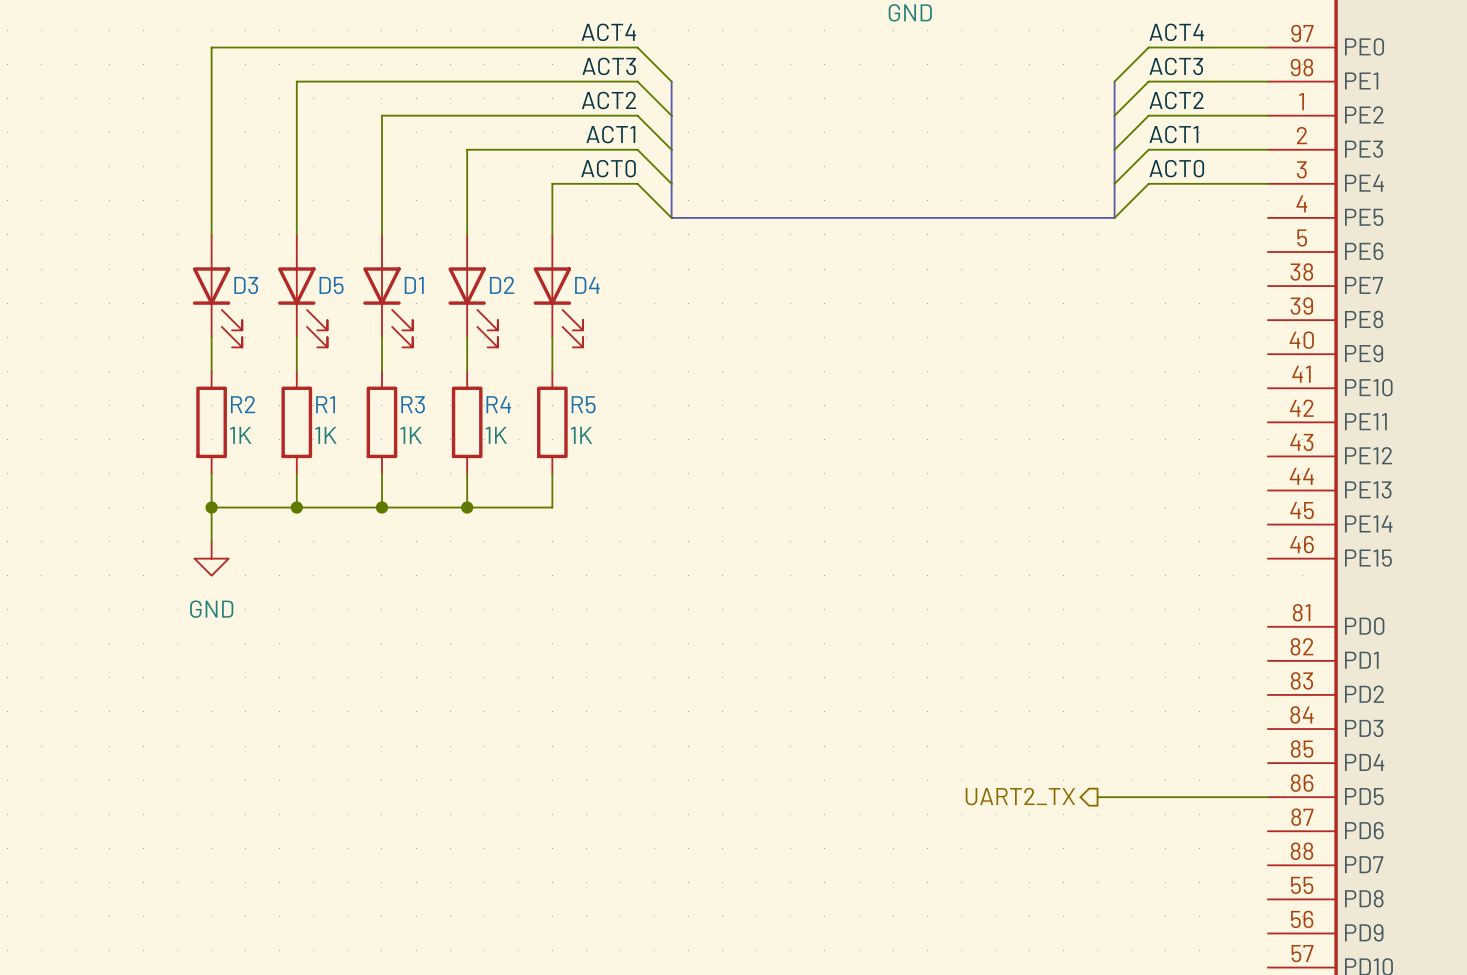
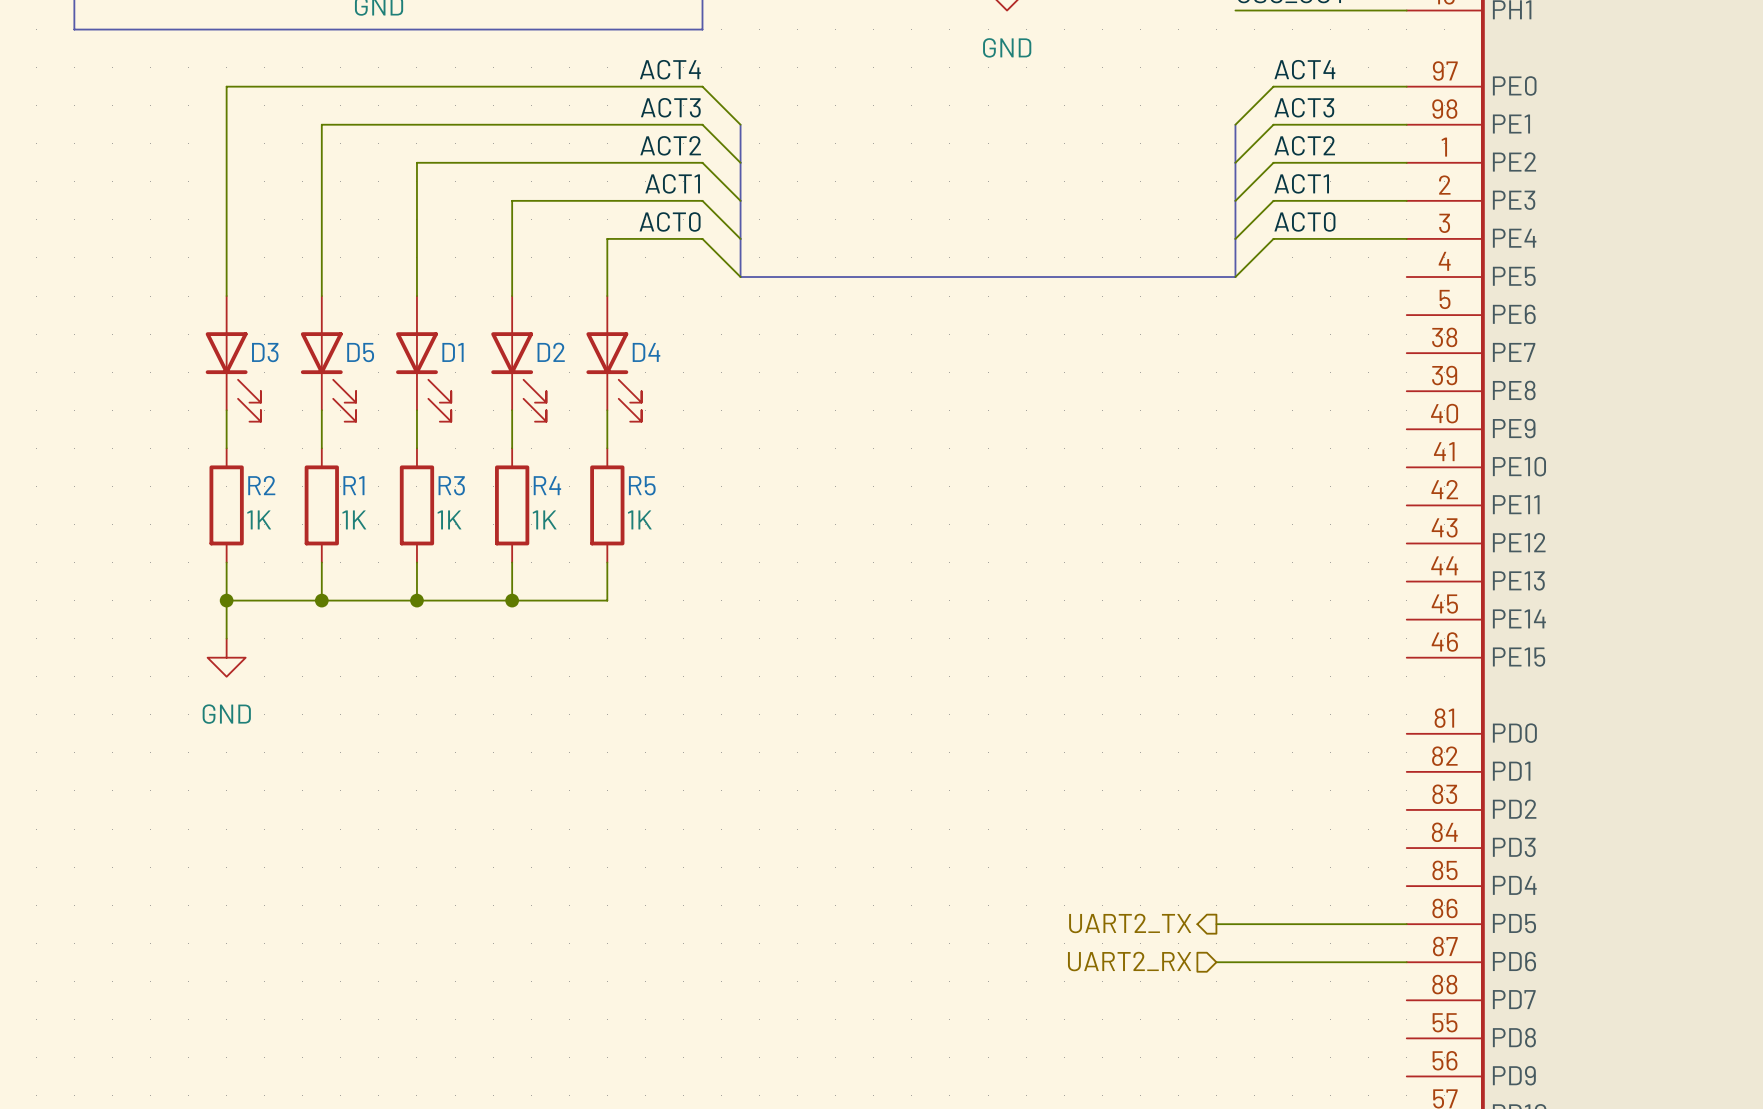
hierarchical label: none -> UART2_RX (1129, 961)
wire: none -> (1216, 962) (1406, 962)

